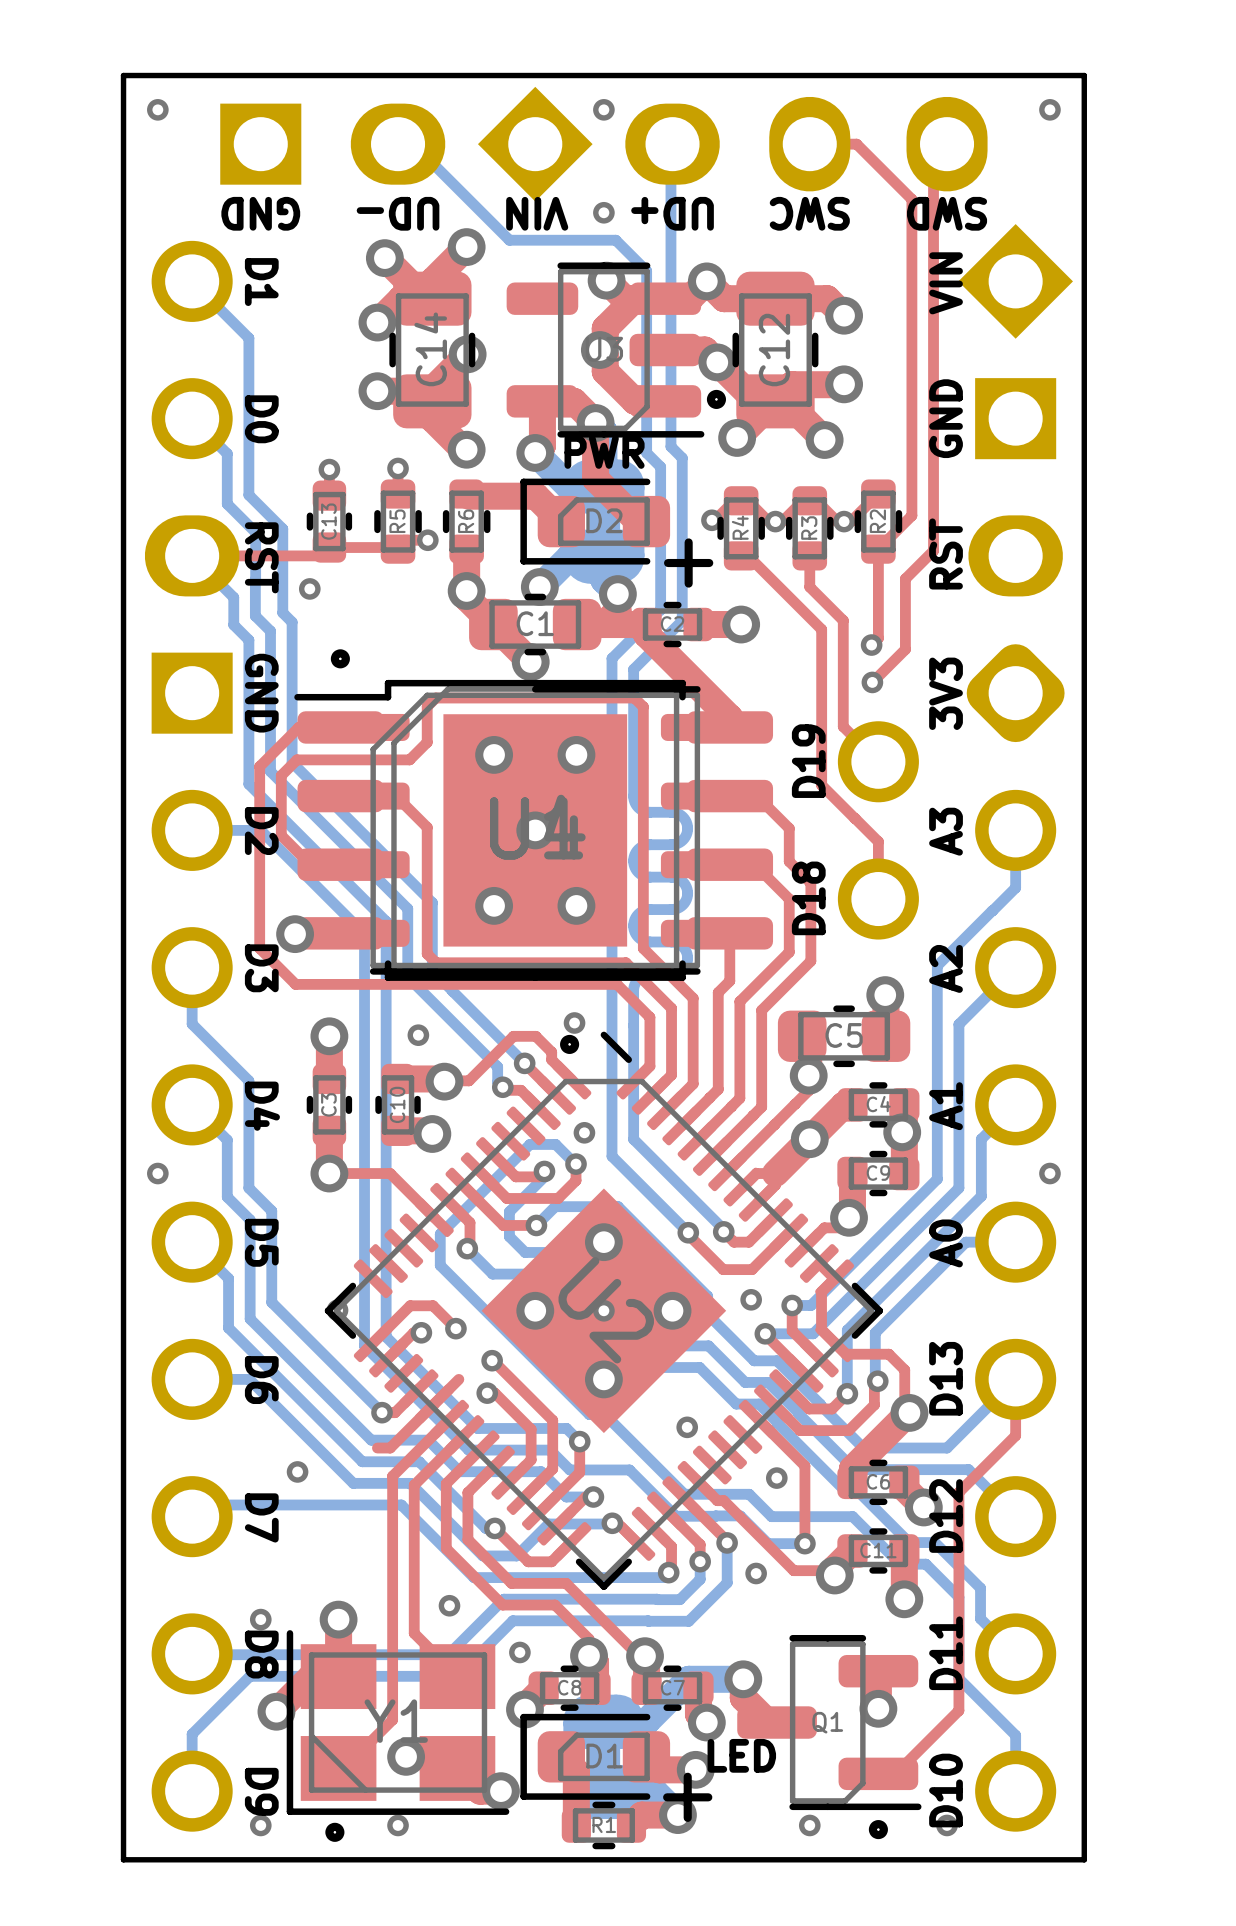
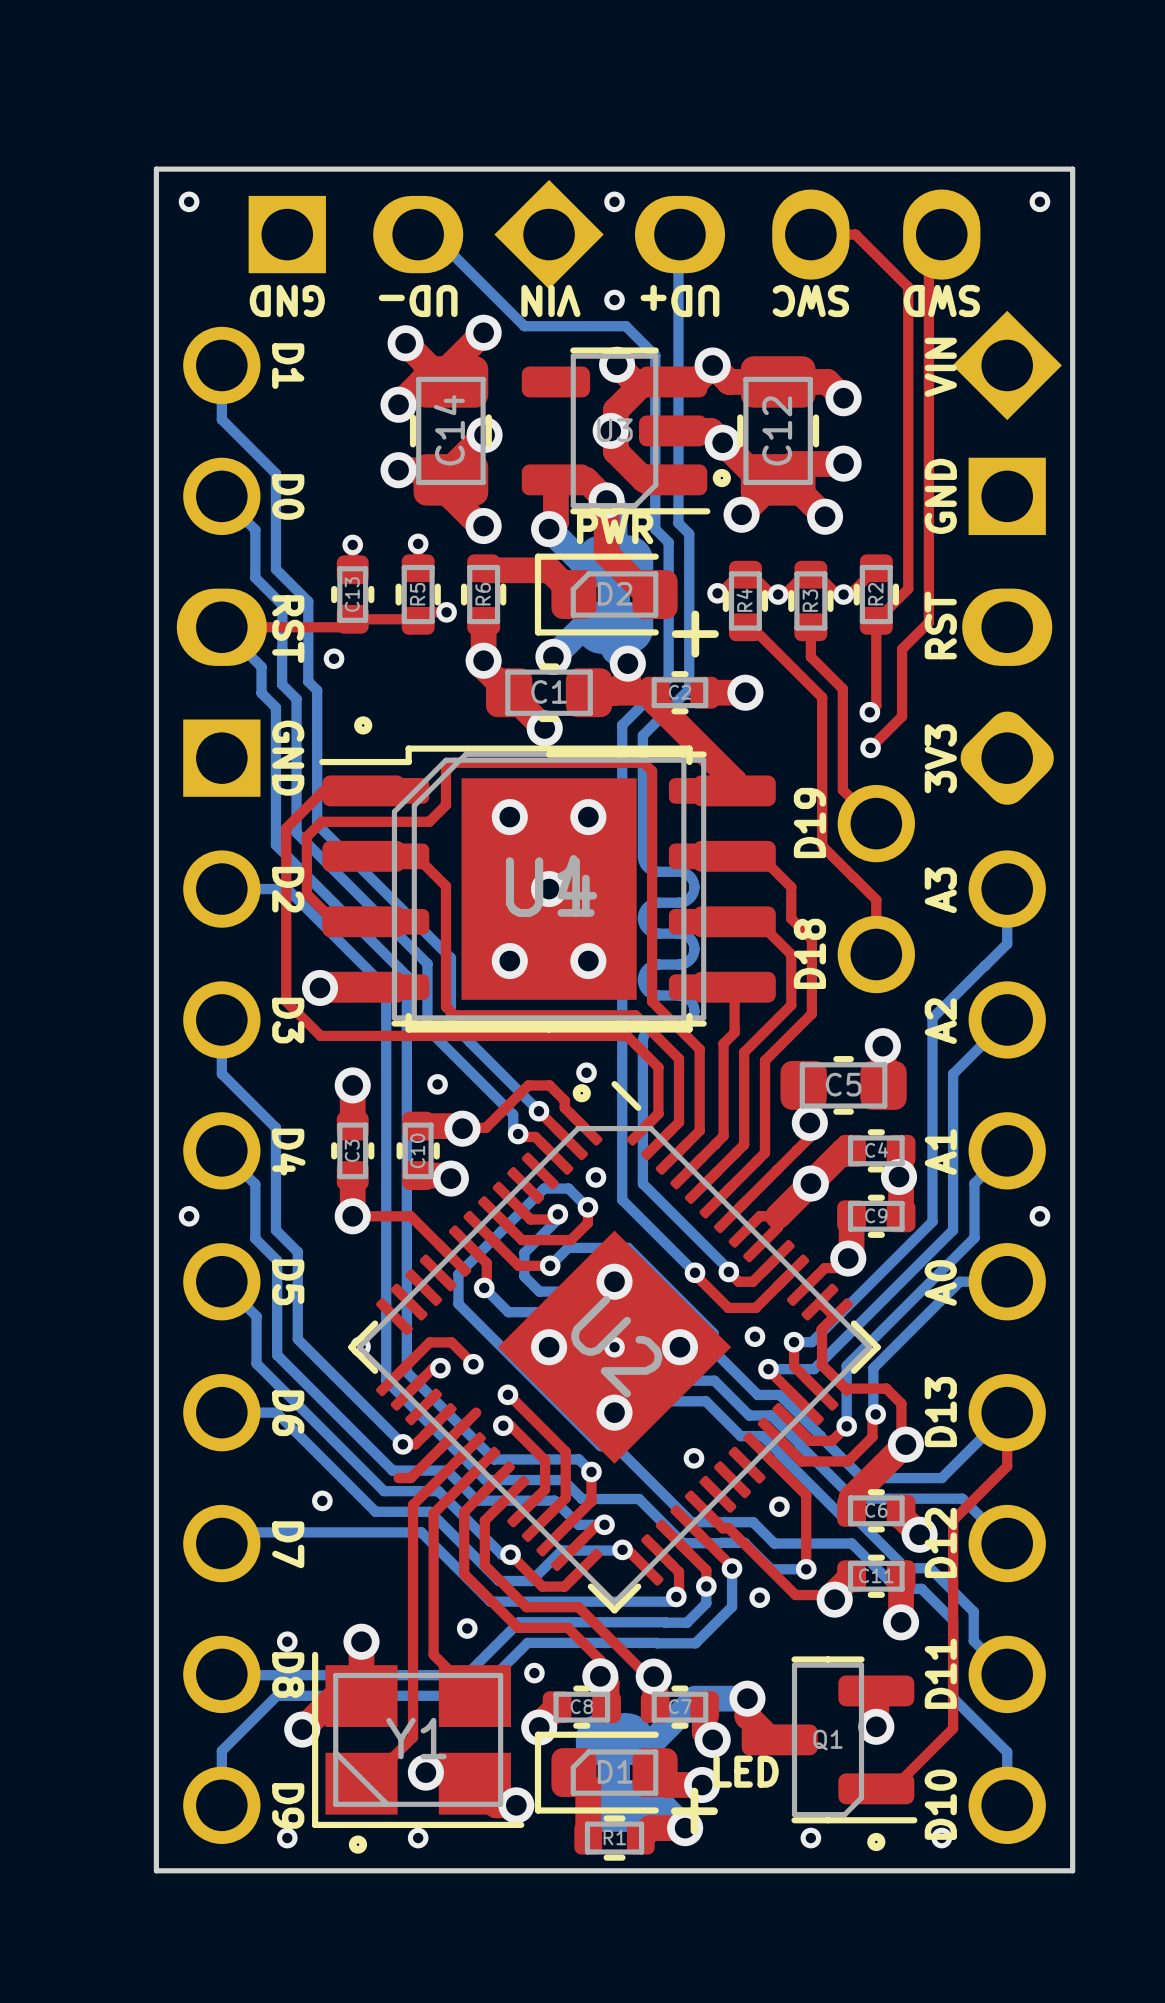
bottom track: (192, 281) (248, 338) (248, 394) -> (221, 365) (221, 419) (275, 473)

